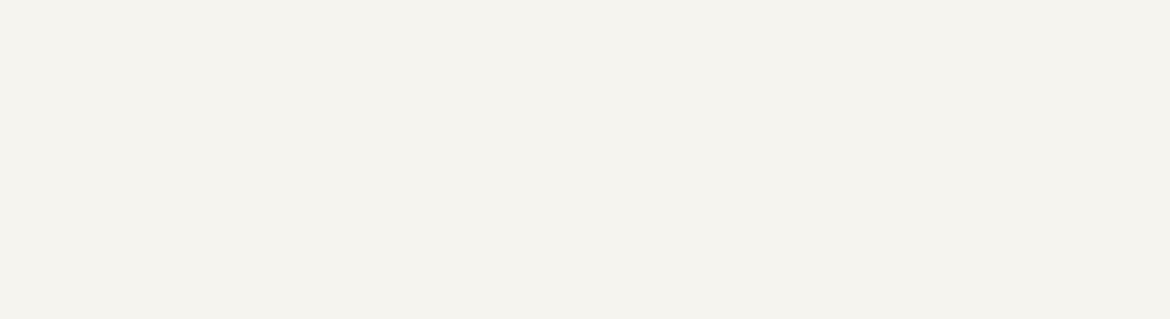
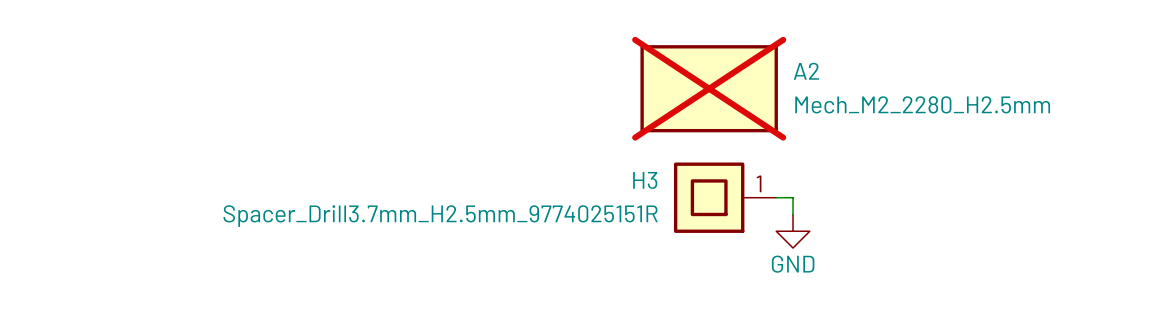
A2: none -> Mech_M2_2280_H2.5mm (709, 88)
H3: none -> Spacer_Drill3.7mm_H2.5mm_9774025151R (725, 197)
wire: none -> (776, 197) (793, 197) (793, 214)
power symbol: none -> GND (793, 231)

